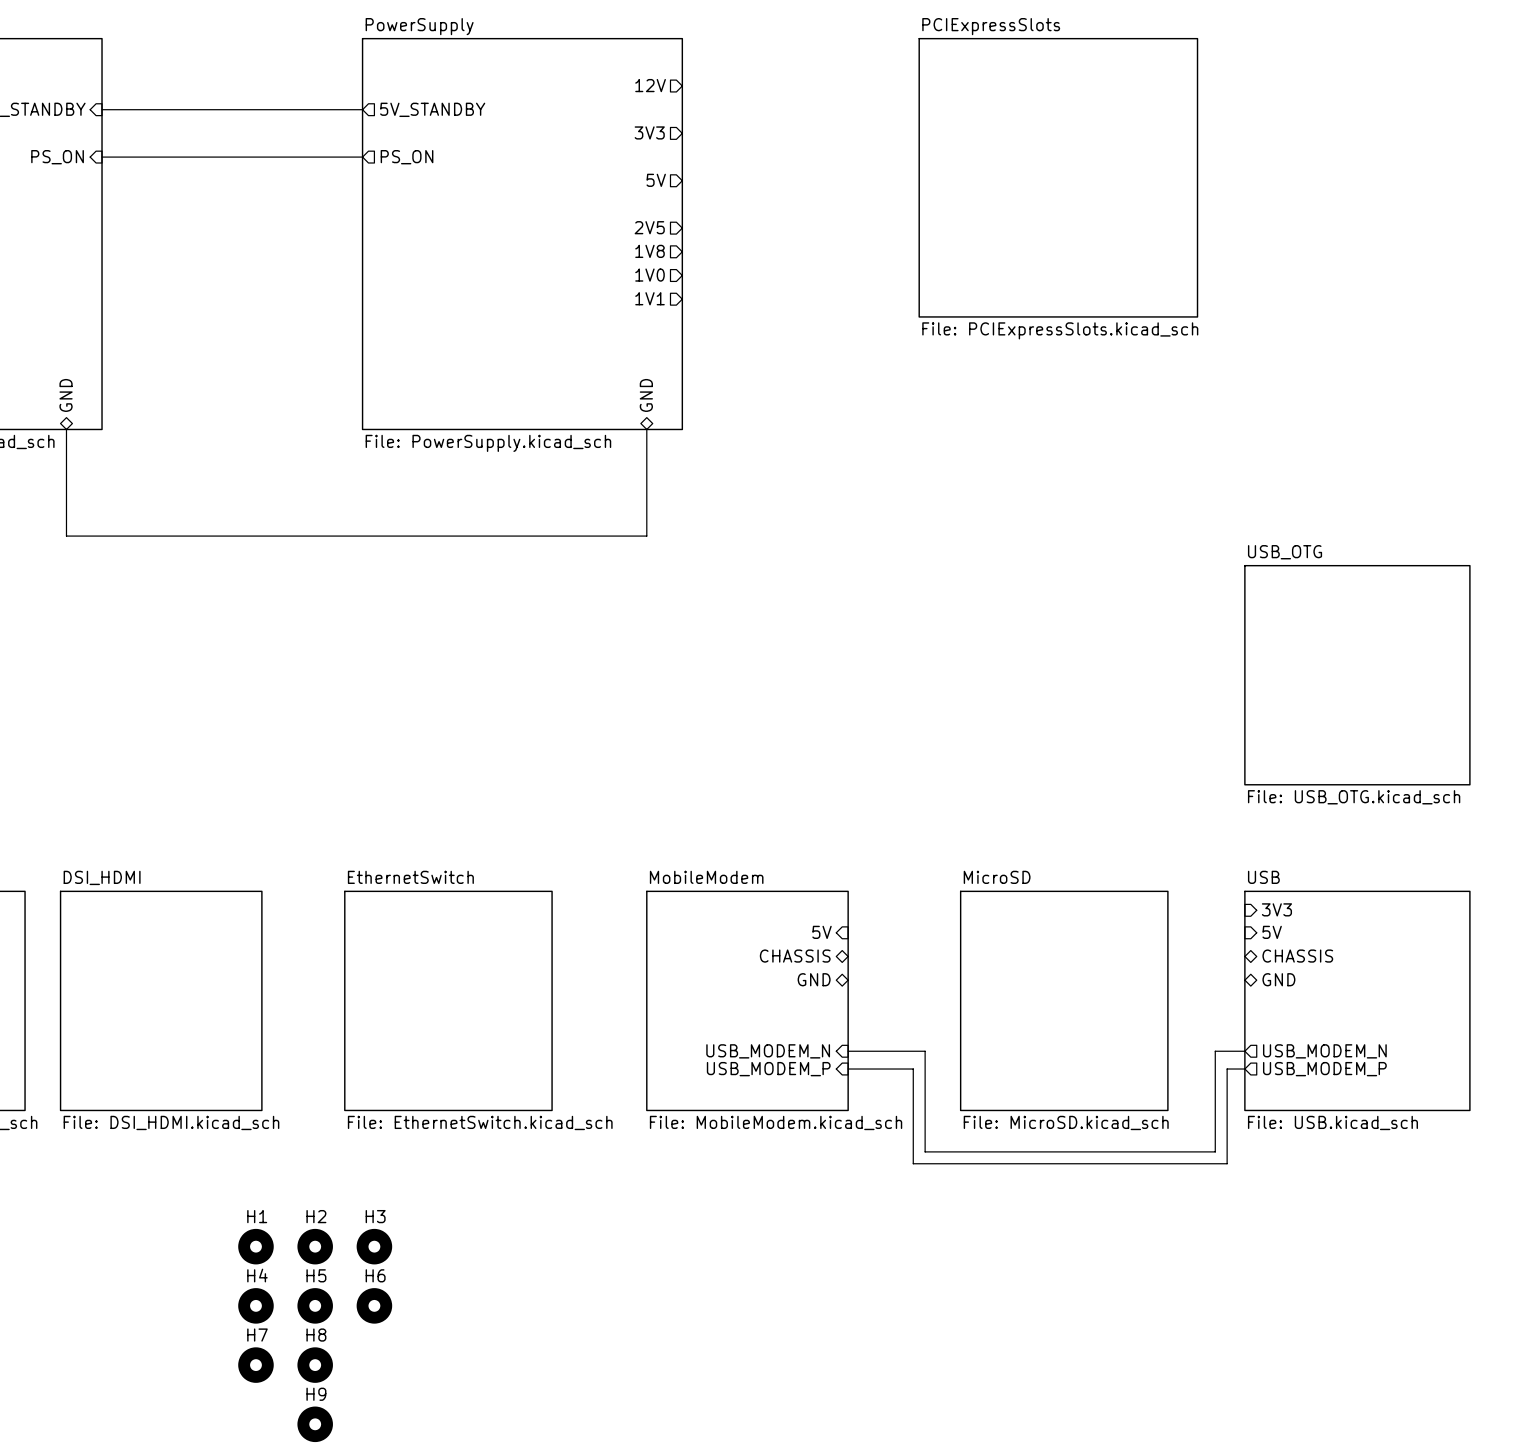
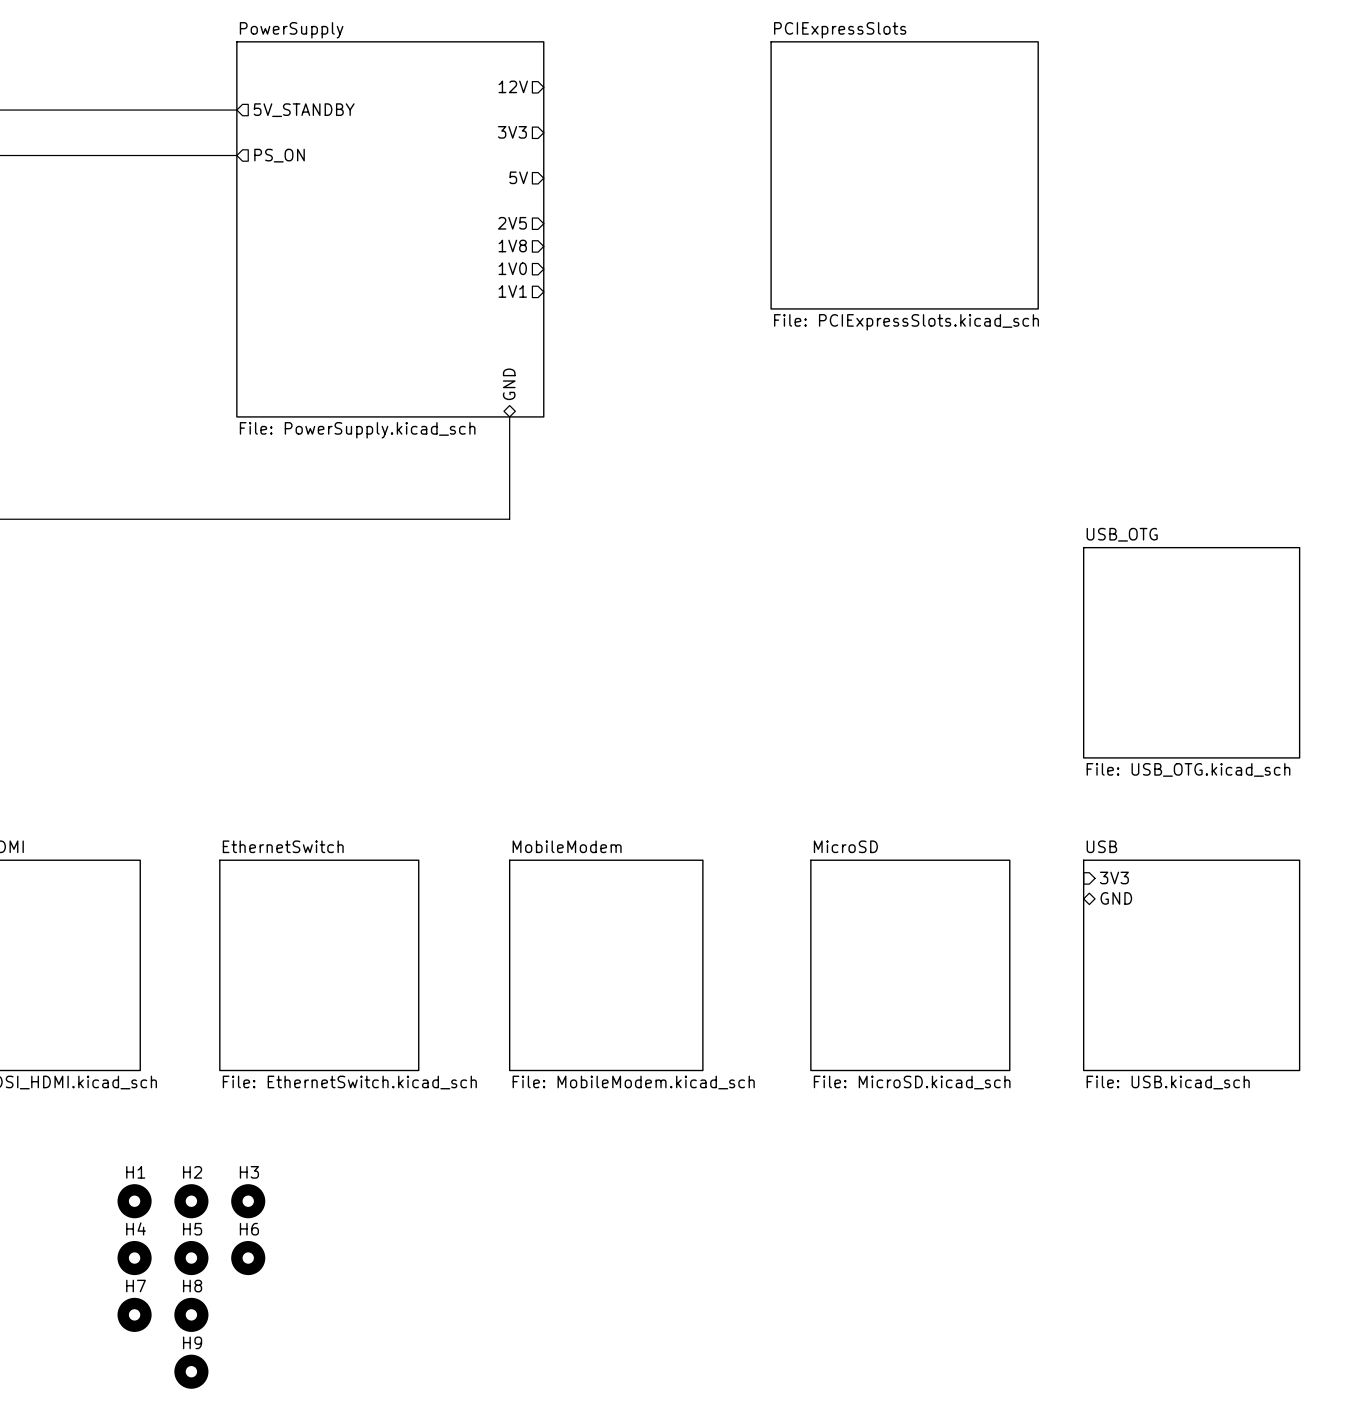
sheet pin: 5V (822, 932) -> none
sheet pin: 5V (1272, 932) -> none
sheet pin: CHASSIS (795, 956) -> none
sheet pin: CHASSIS (1297, 956) -> none
sheet pin: GND (814, 979) -> none
sheet pin position: GND (1278, 979) -> GND (1116, 898)
sheet pin: USB_MODEM_N (768, 1051) -> none
wire: (848, 1051) (925, 1051) (925, 1151) (1215, 1151) (1215, 1051) (1244, 1051) -> none
sheet pin: USB_MODEM_N (1324, 1051) -> none
sheet pin: USB_MODEM_P (768, 1069) -> none
wire: (848, 1069) (913, 1069) (913, 1163) (1227, 1163) (1227, 1069) (1244, 1069) -> none
sheet pin: USB_MODEM_P (1324, 1069) -> none

